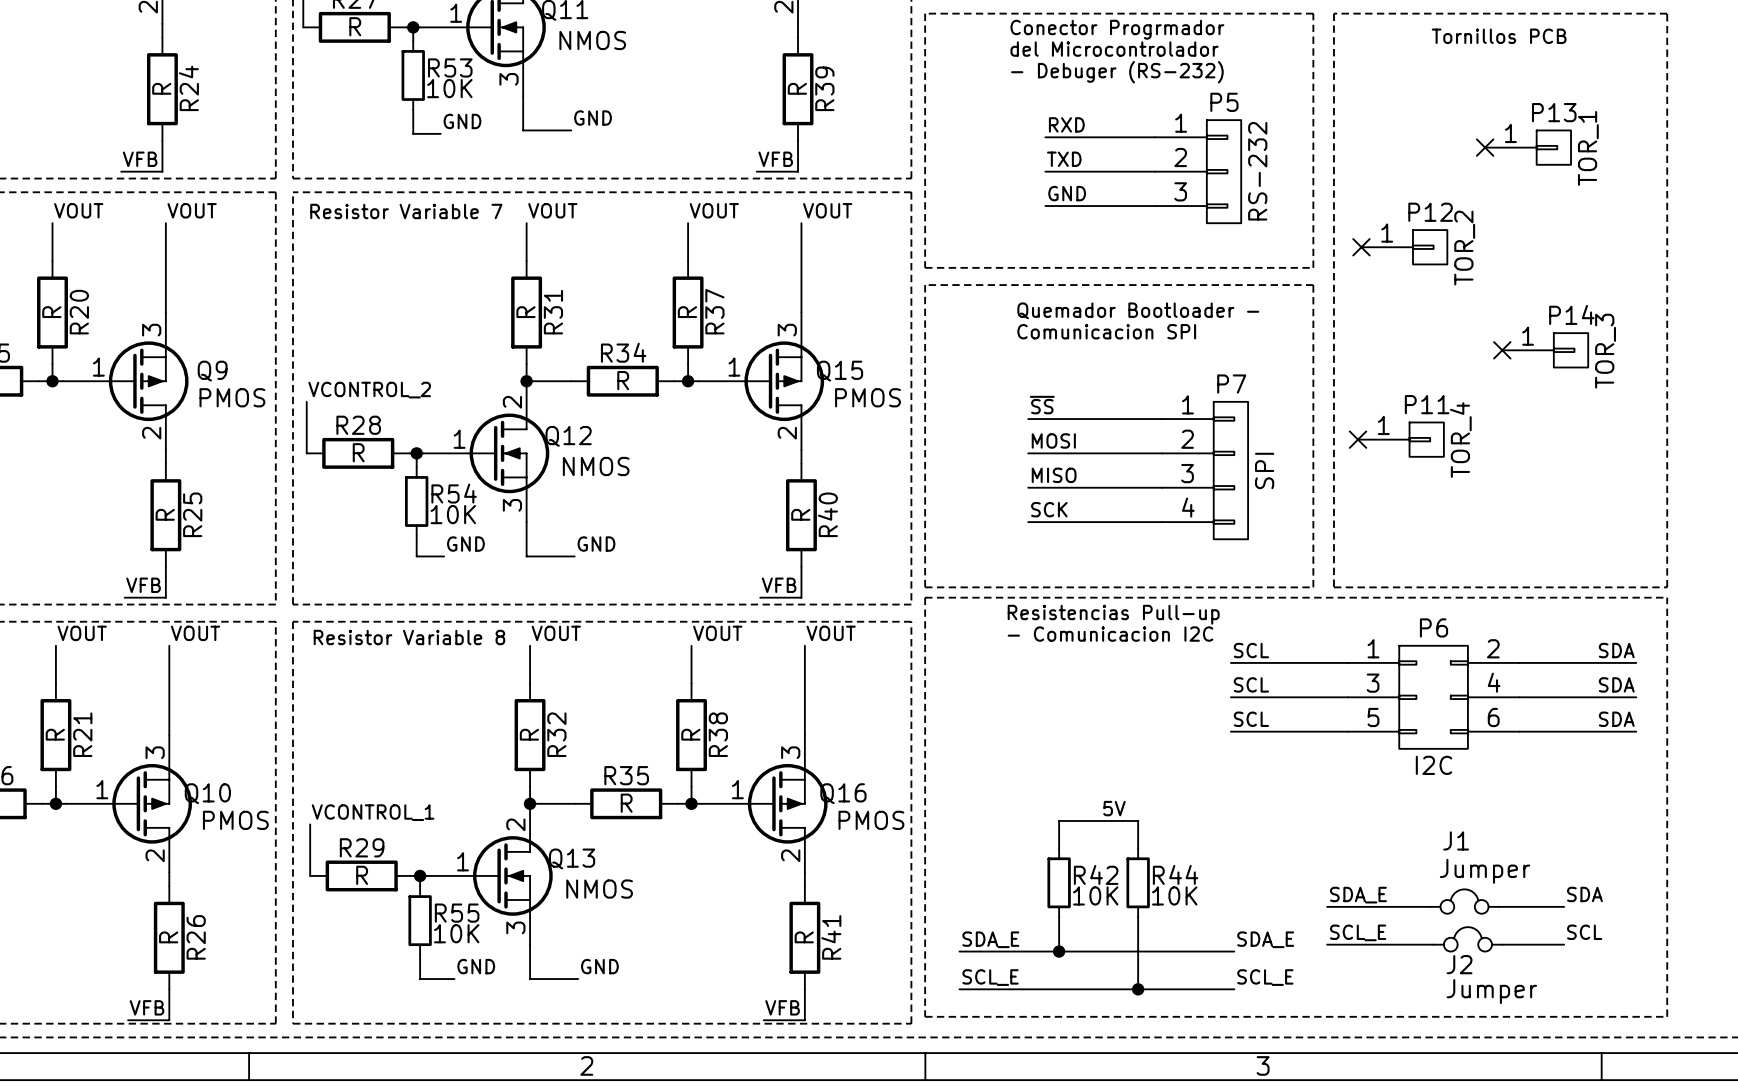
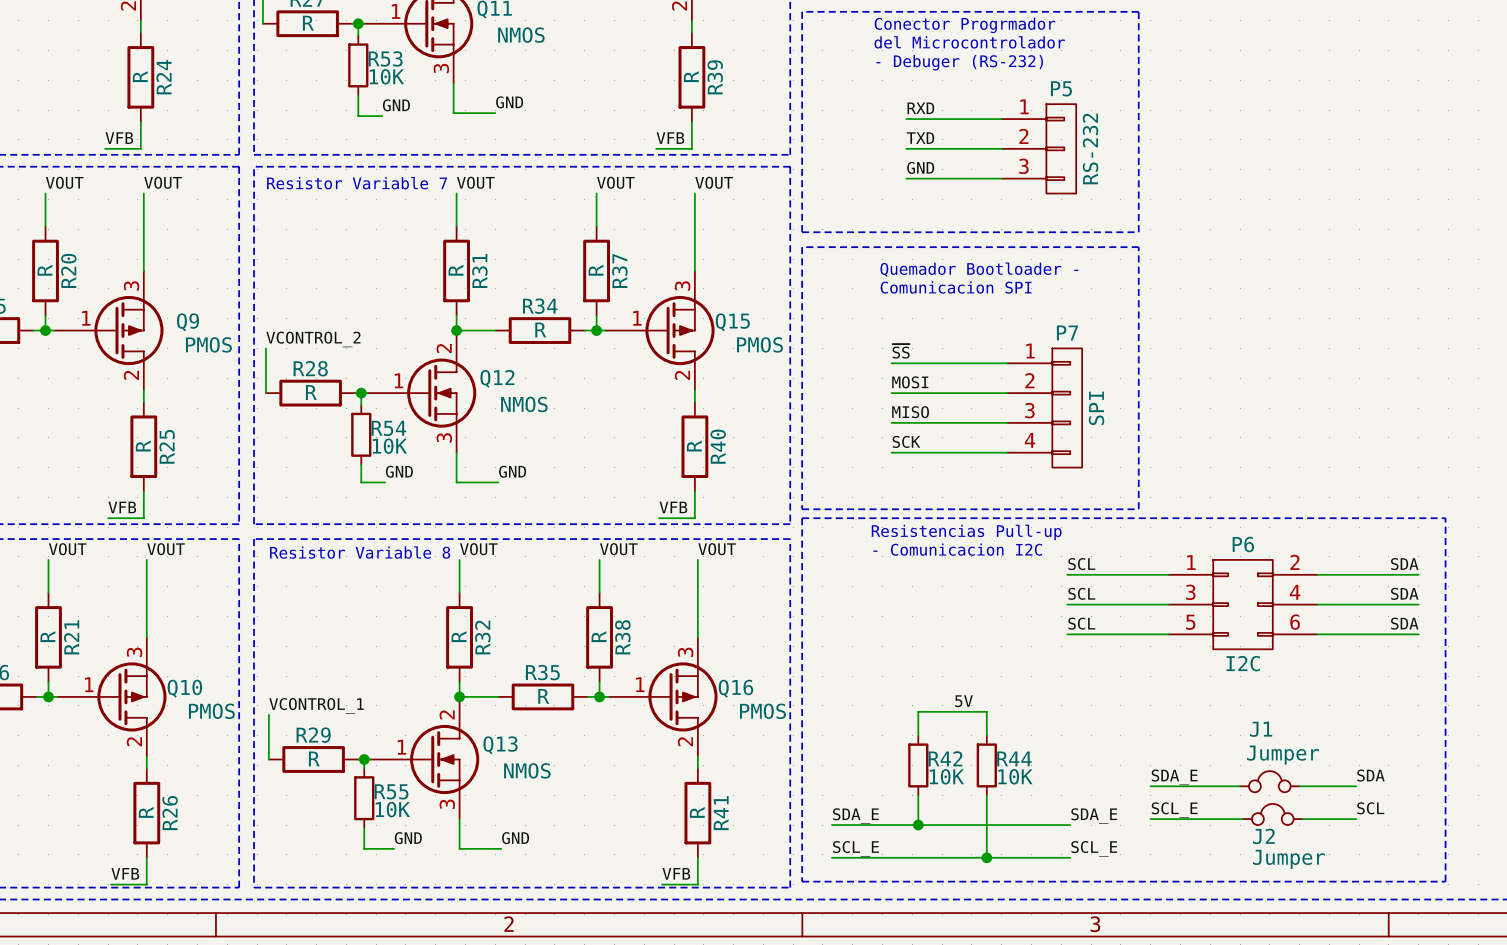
line: (1333, 13) (1333, 587) (1667, 587) (1667, 13) (1333, 13) -> none
text: Tornillos PCB (1499, 36) -> none
no-connect mark: (1485, 147) -> none
P13: TOR_1 (1528, 147) -> none
no-connect mark: (1361, 247) -> none
P12: TOR_2 (1404, 247) -> none
no-connect mark: (1502, 350) -> none
P14: TOR_3 (1545, 350) -> none
no-connect mark: (1358, 439) -> none
P11: TOR_4 (1400, 439) -> none

